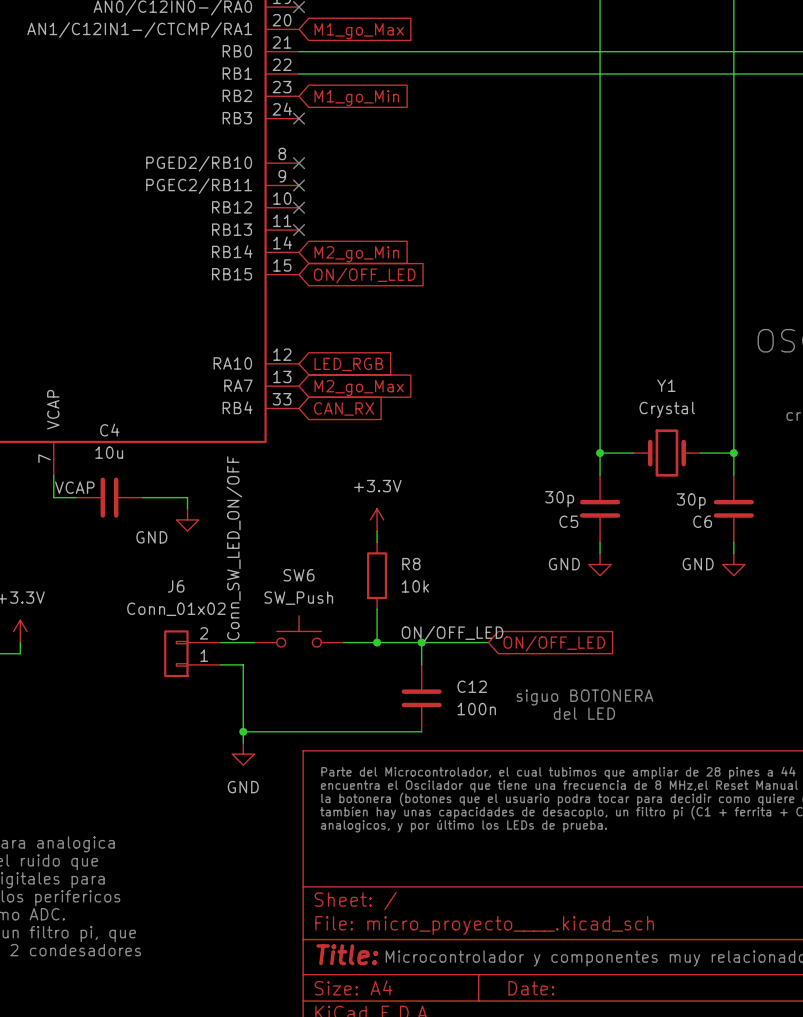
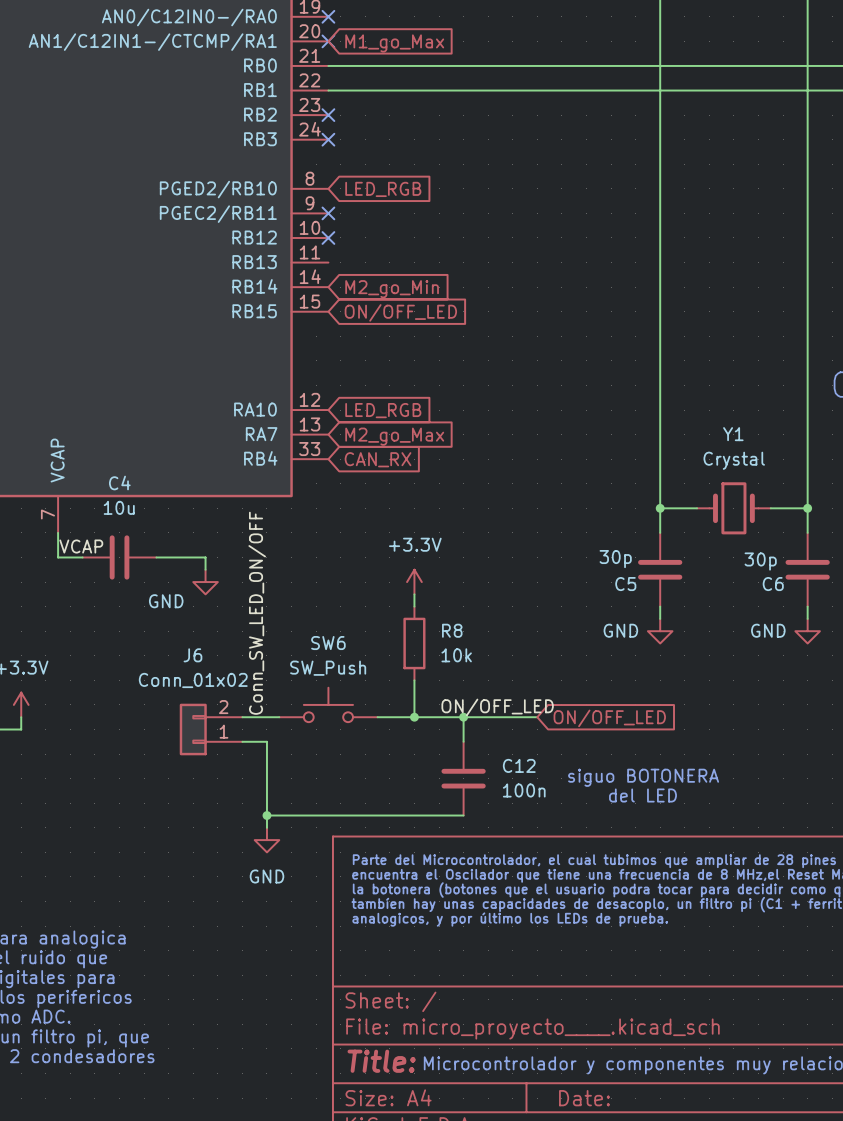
no-connect mark: none -> (328, 41)
no-connect mark: none -> (328, 115)
global label: M1_go_Min (356, 98) -> none
no-connect mark: (299, 163) -> none
global label: none -> LED_RGB (383, 189)
no-connect mark: (299, 230) -> none

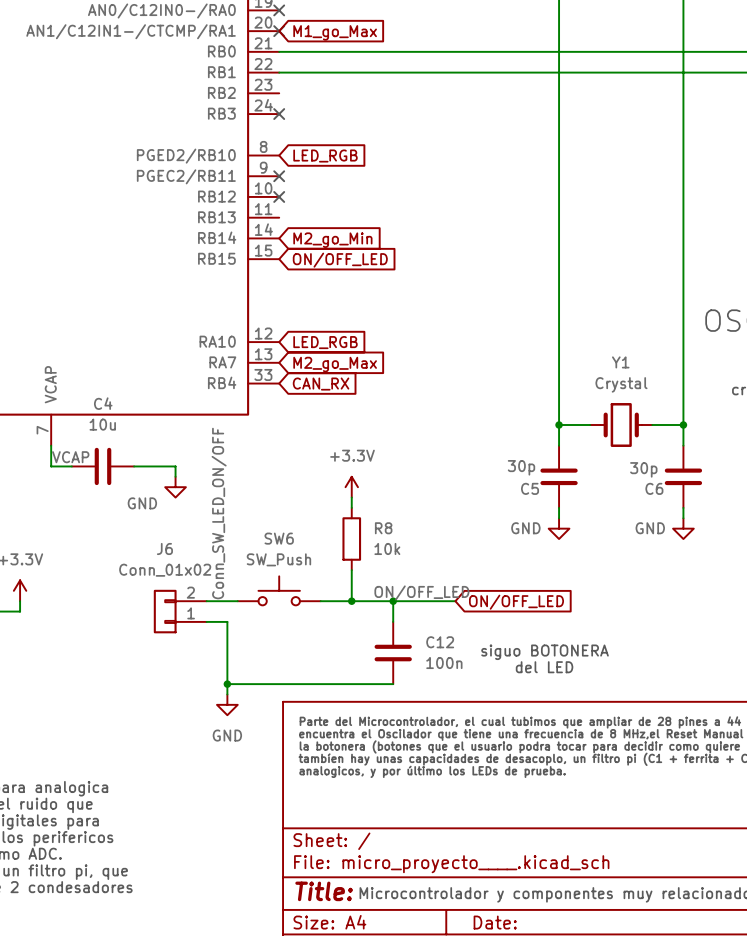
no-connect mark: (328, 115) -> none

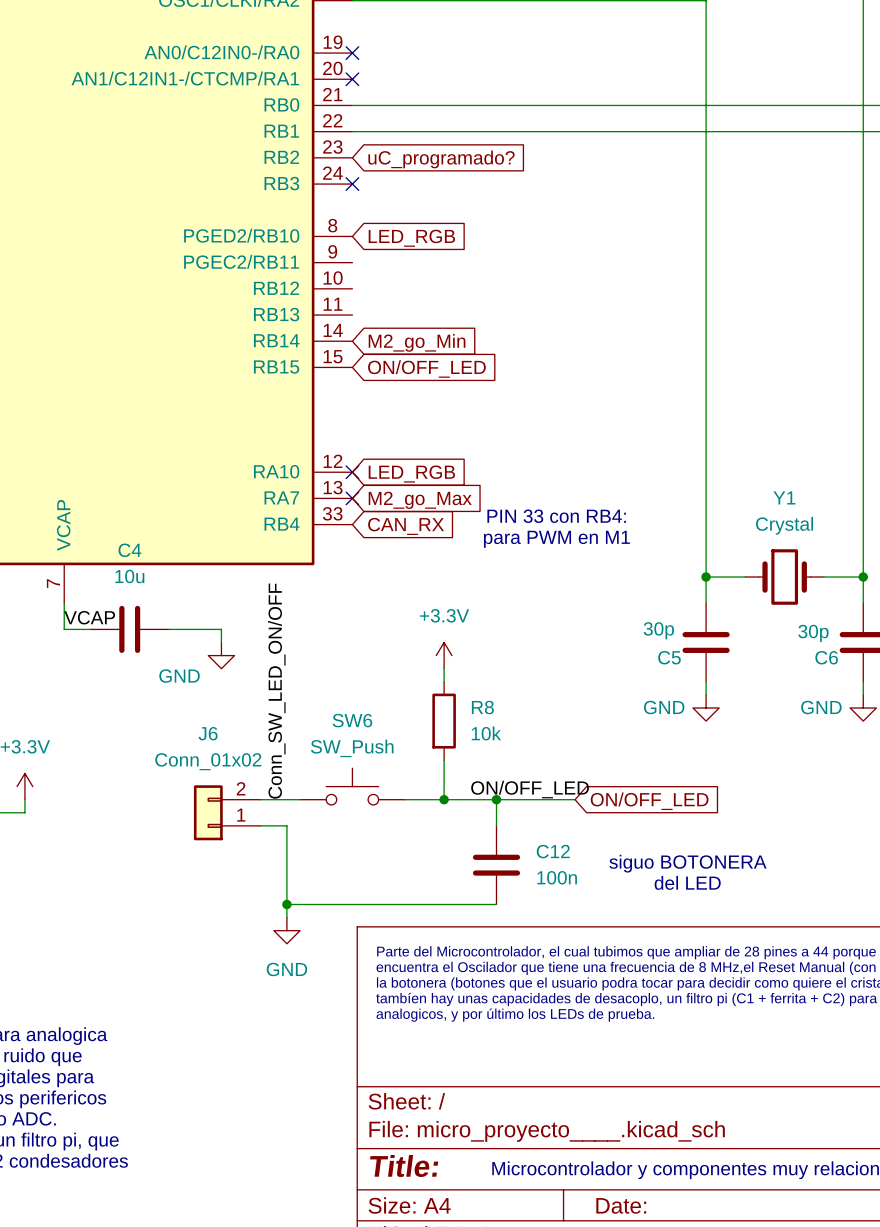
global label: M1_go_Max (335, 32) -> none
global label: none -> uC_programado? (441, 159)
no-connect mark: (279, 176) -> none
no-connect mark: (279, 196) -> none
no-connect mark: none -> (352, 472)
no-connect mark: none -> (352, 498)
text: none -> PIN 33 con RB4: (556, 516)
text: none -> para PWM en M1 (556, 539)

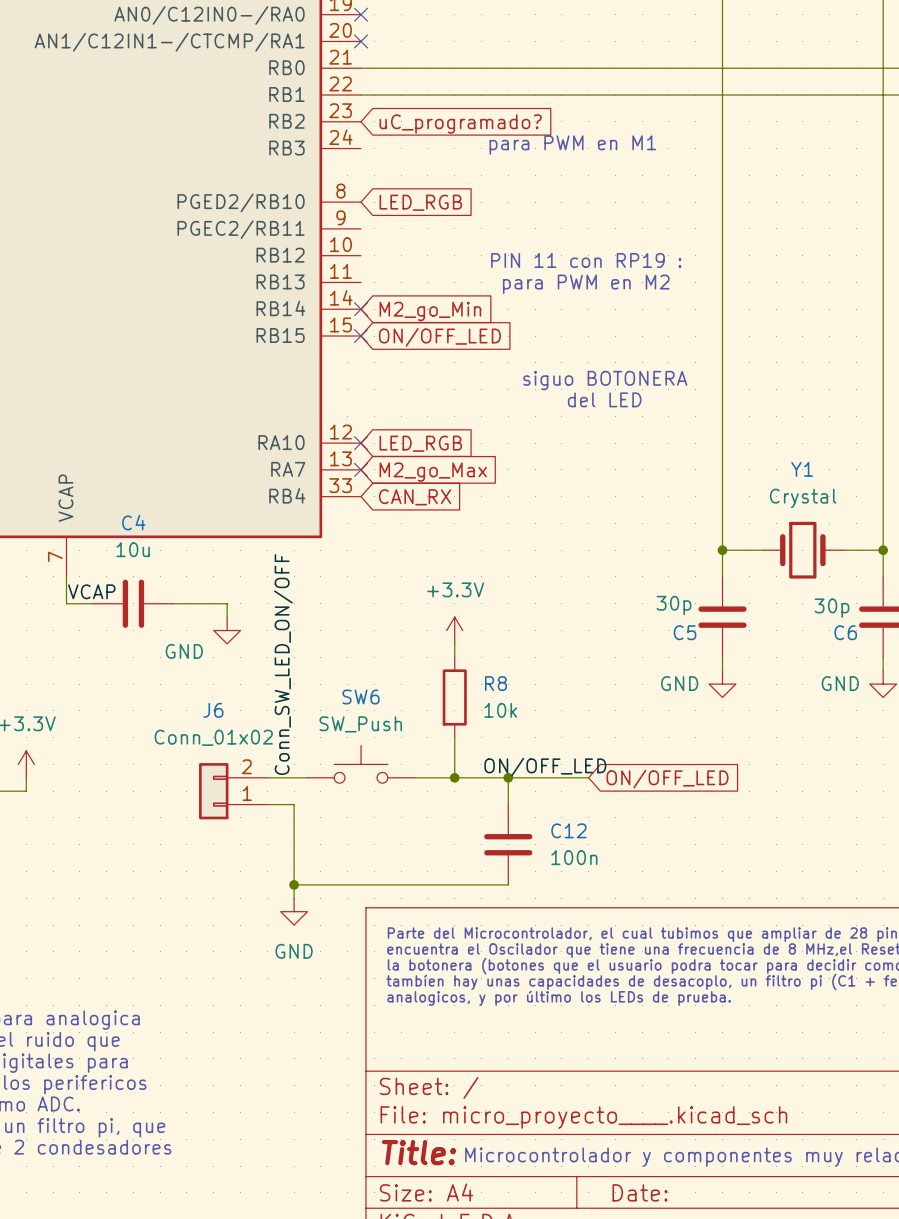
text: none -> para PWM en M1 (572, 145)
no-connect mark: (352, 184) -> none
text: none -> PIN 11 con RP19 : (586, 260)
text: none -> para PWM en M2 (586, 284)
no-connect mark: none -> (361, 309)
no-connect mark: none -> (361, 336)
text: none -> siguo BOTONERA (605, 380)
text: none -> del LED (604, 399)
text: PIN 33 con RB4: (556, 516) -> none
text: para PWM en M1 (556, 539) -> none
text: siguo BOTONERA (687, 863) -> none
text: del LED (687, 882) -> none

